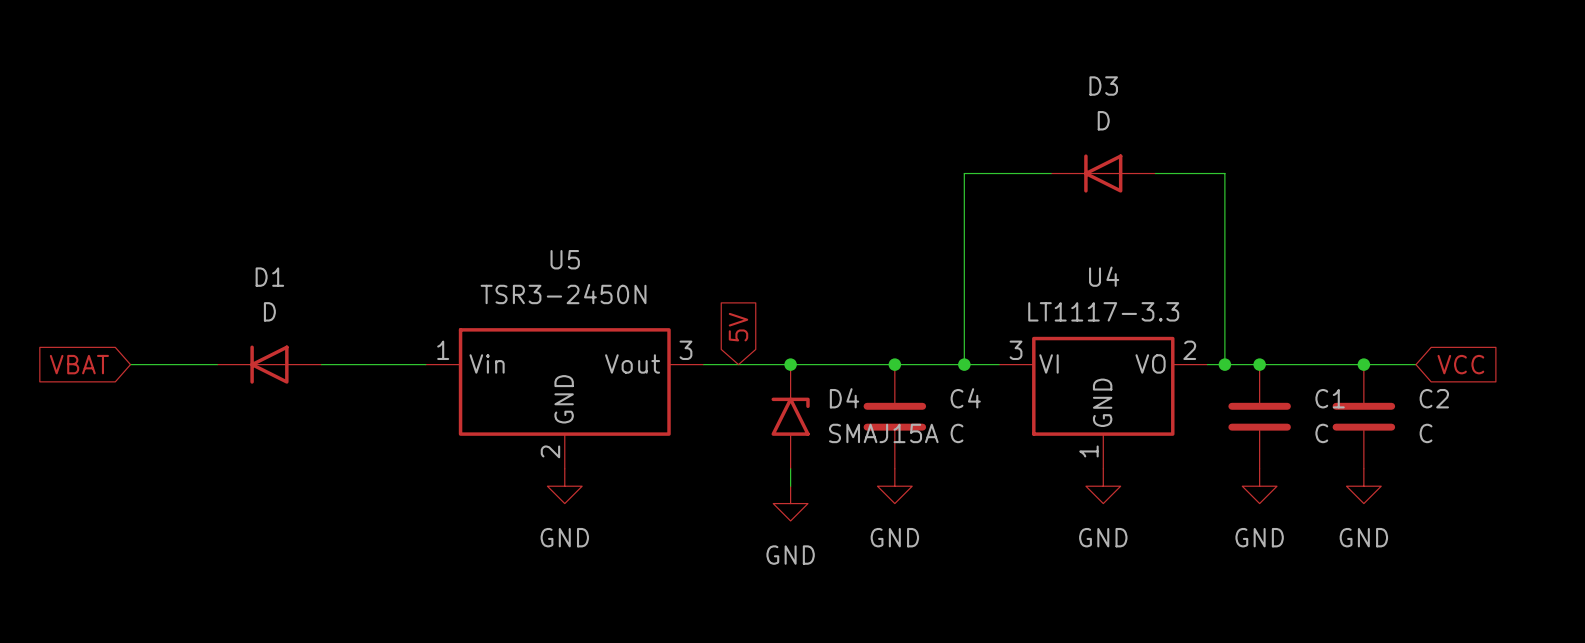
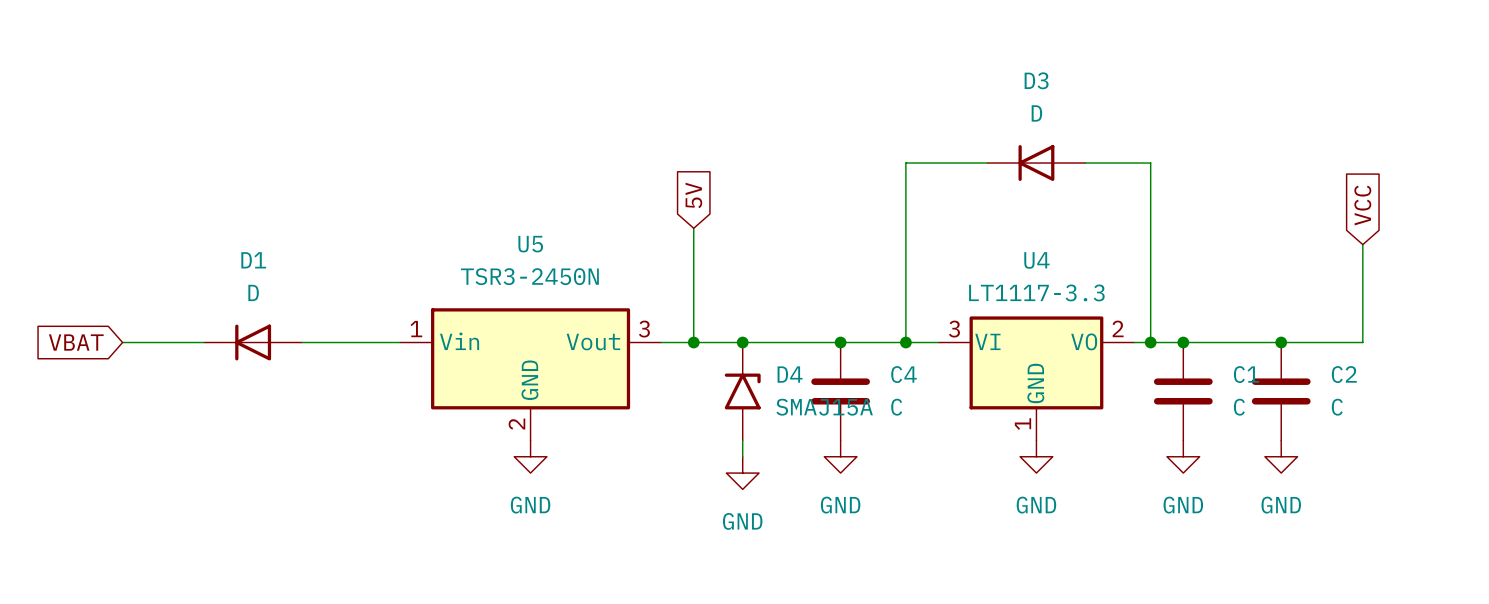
wire: none -> (693, 228) (693, 342)
wire: none -> (1362, 244) (1362, 342) (1330, 342)
global label position: 5V (738, 327) -> 5V (693, 195)
junction: none -> (693, 342)
global label rotation: 0° (1460, 364) -> 90° counterclockwise (1362, 205)
global label position: VCC (1460, 364) -> VCC (1362, 205)

